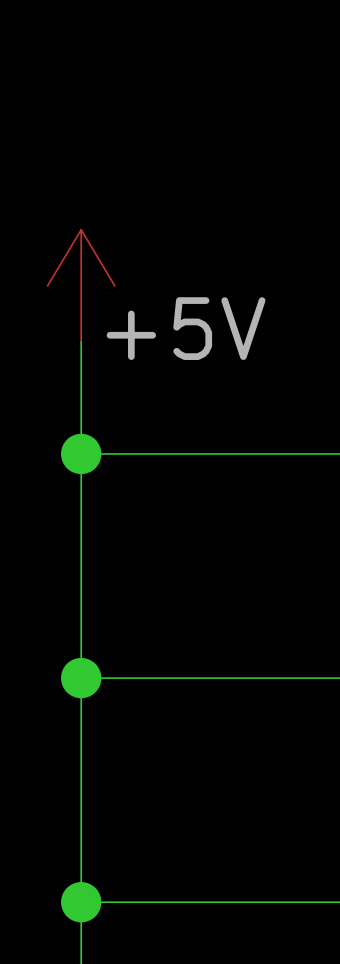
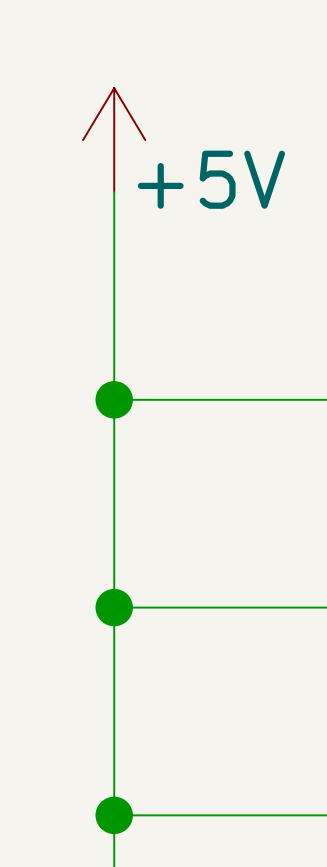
power symbol position: +5V (81, 285) -> +5V (114, 140)

